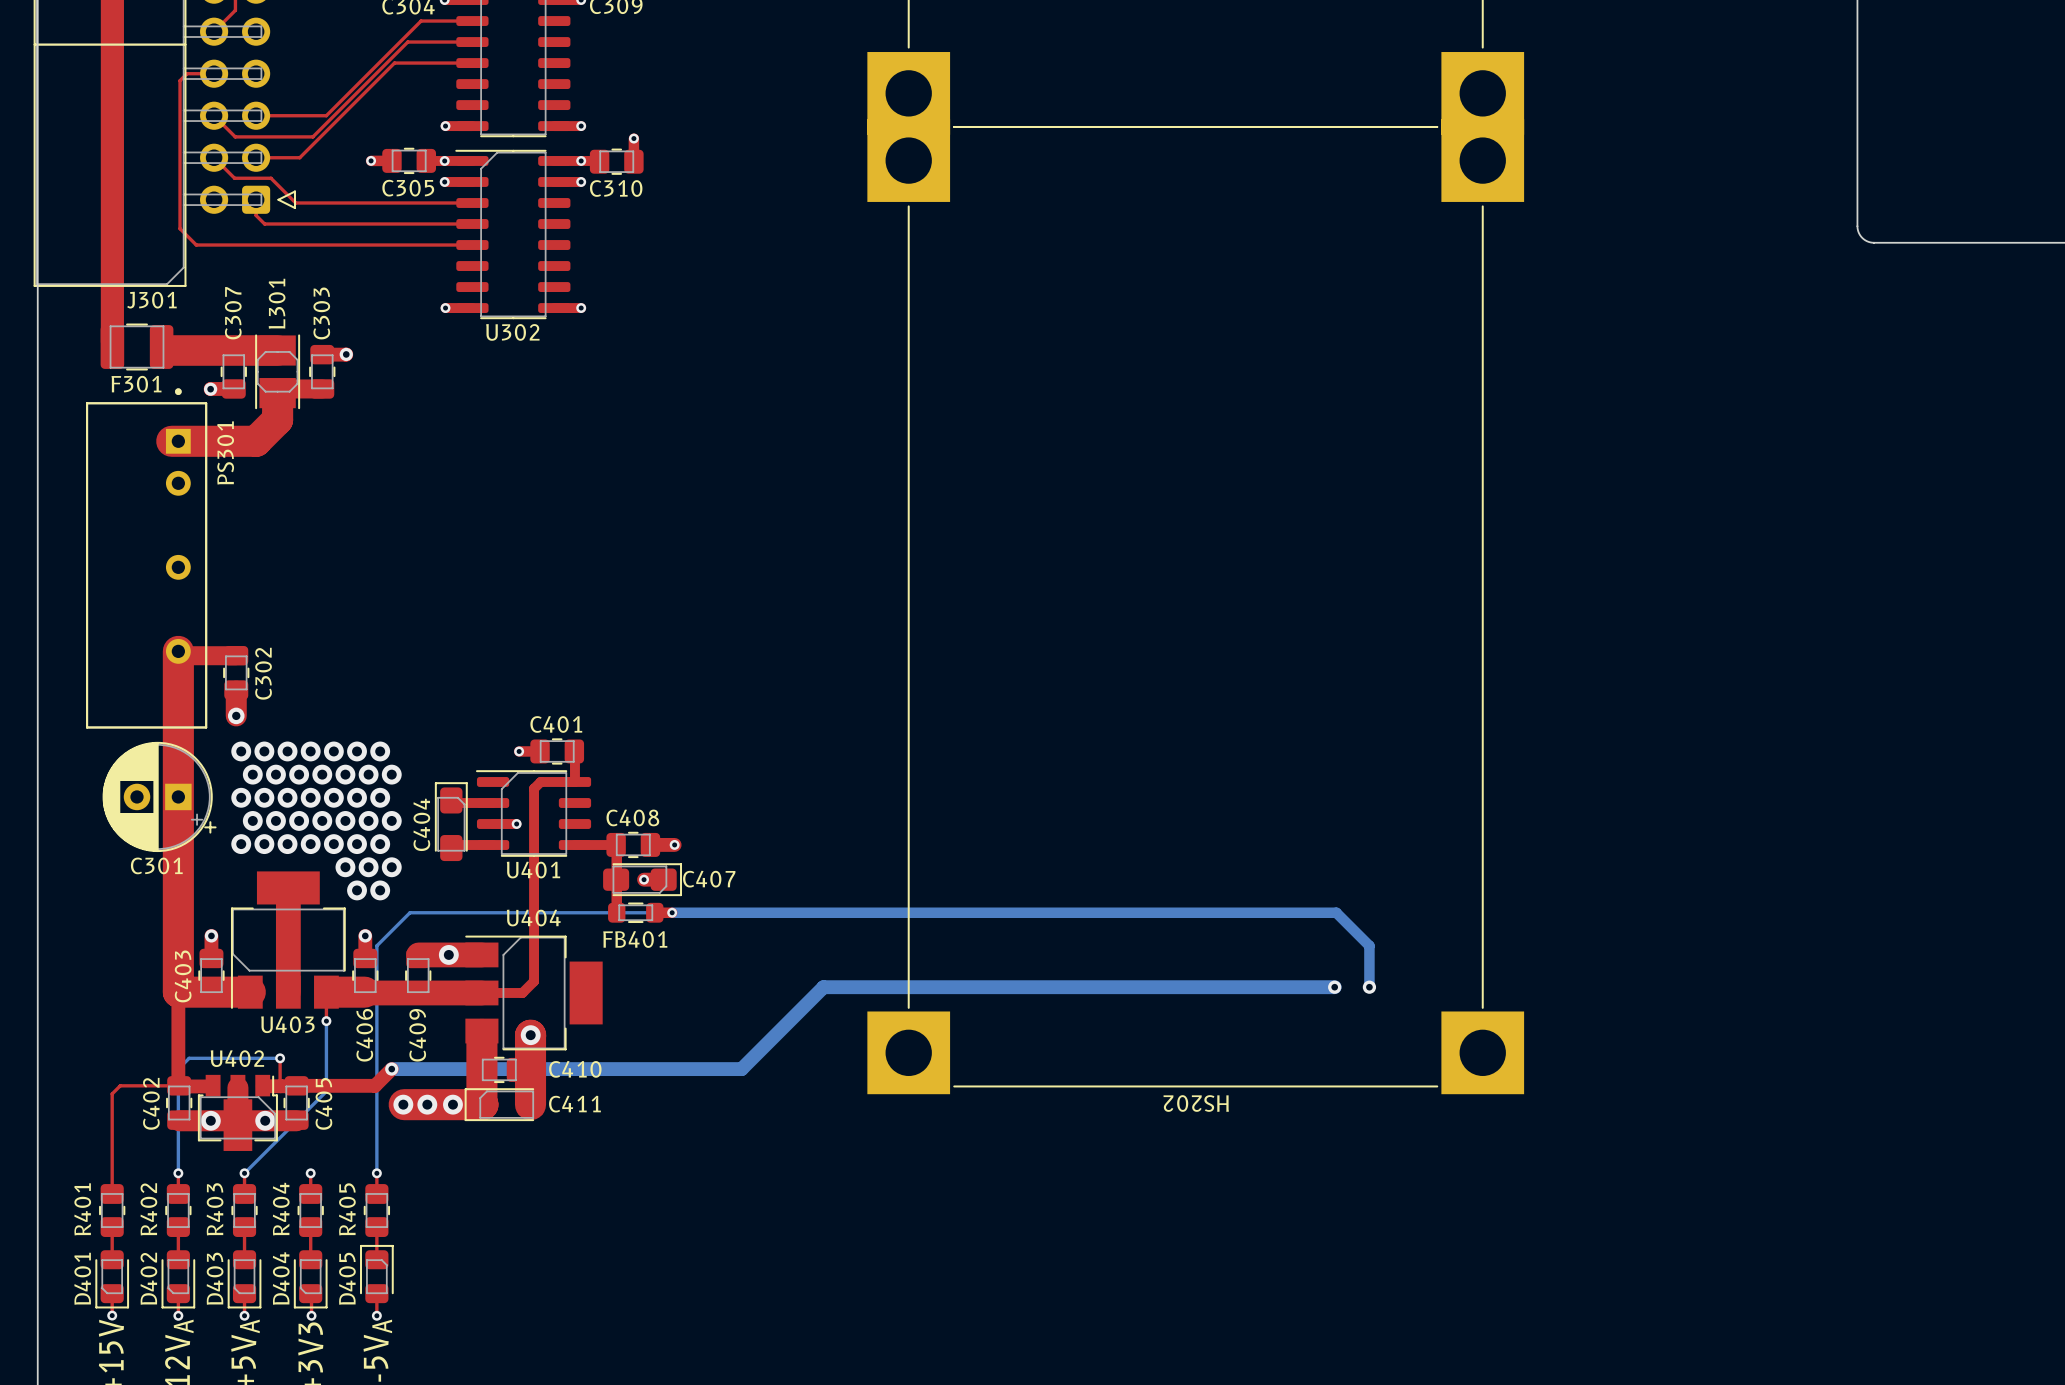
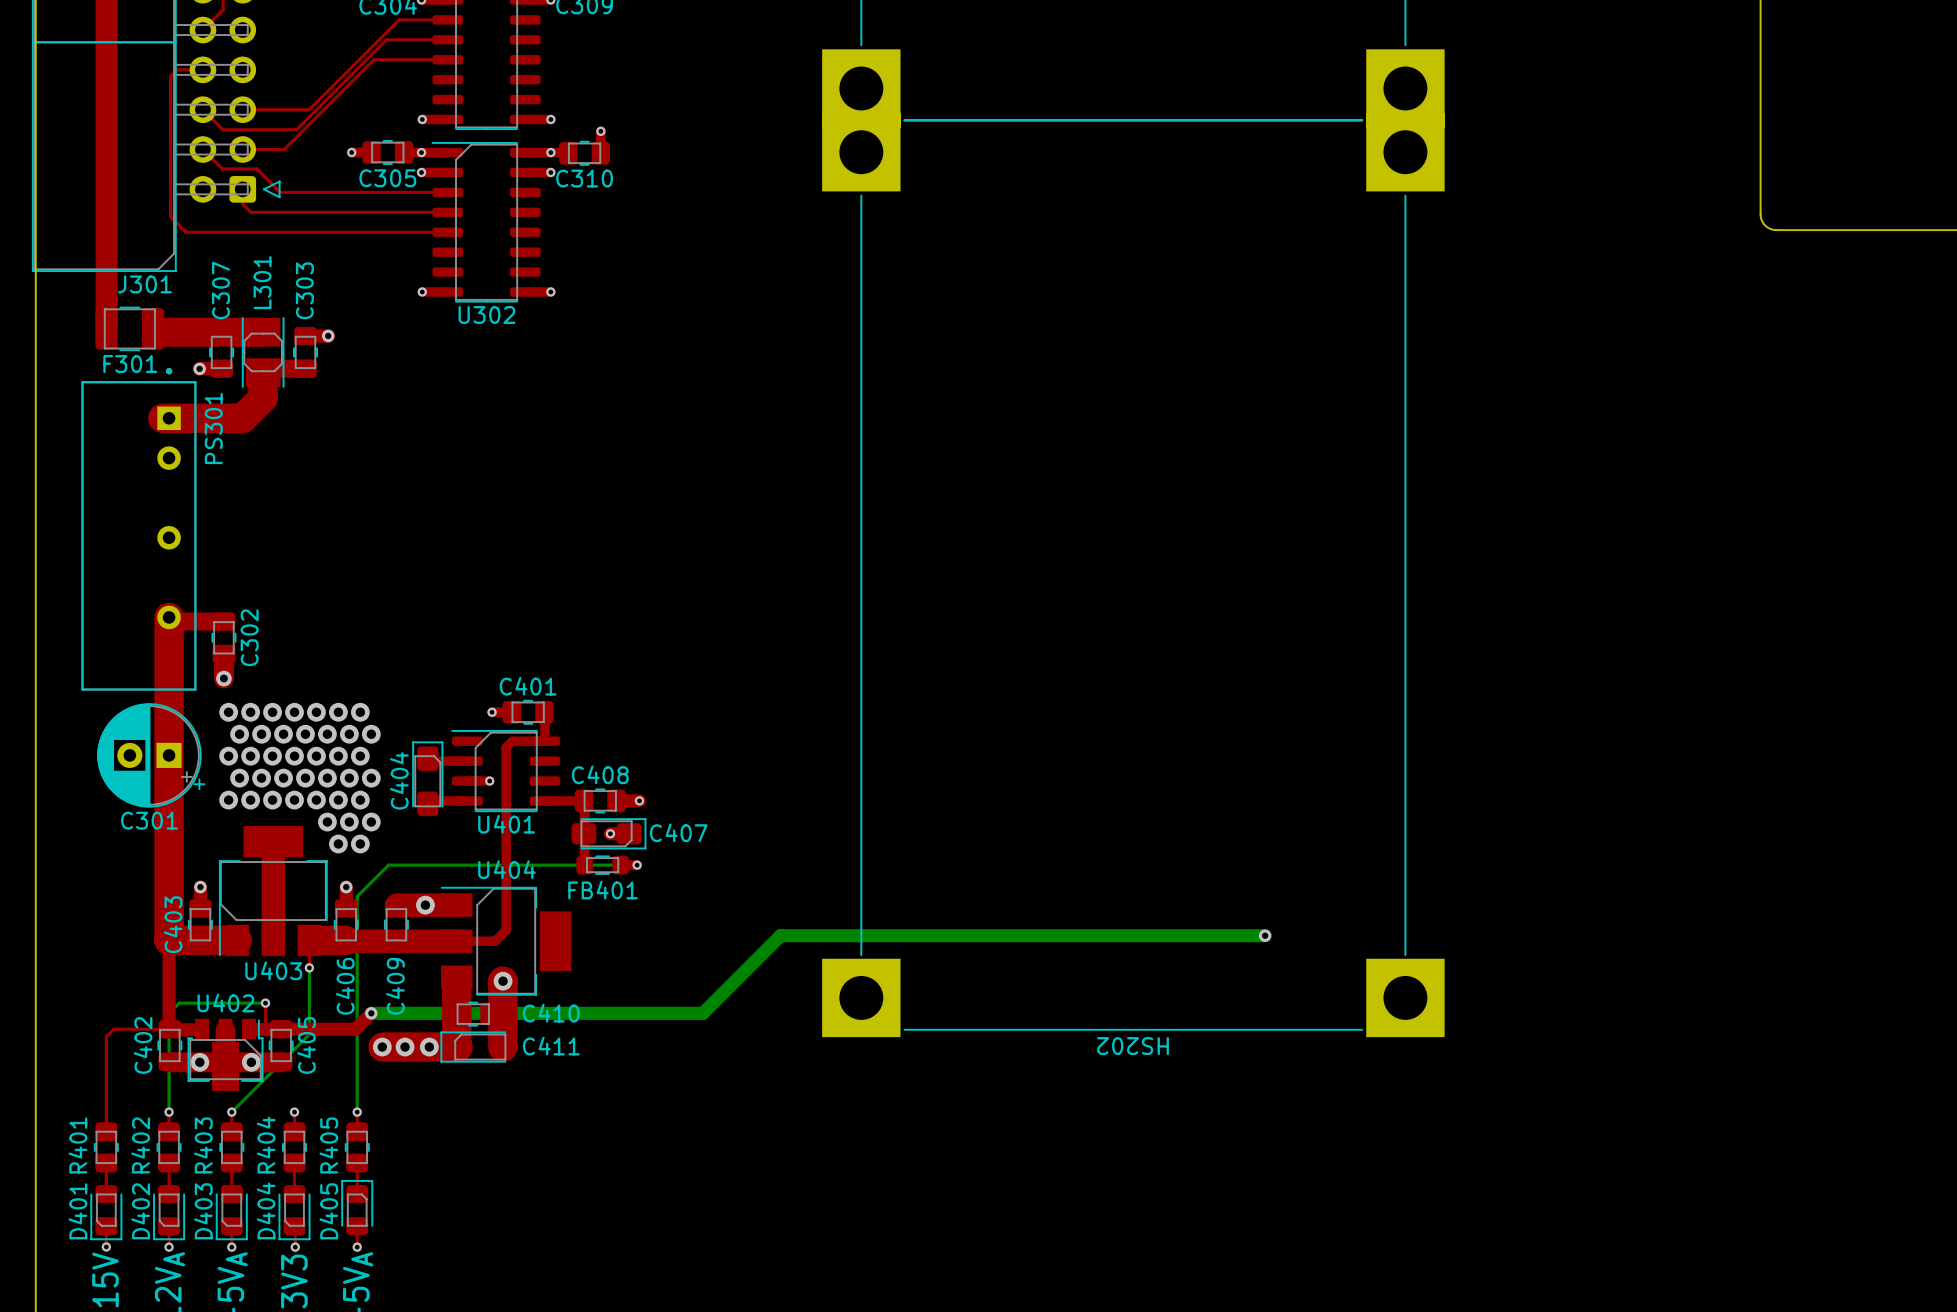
bottom track: (672, 912) (1336, 912) (1369, 945) (1369, 987) -> none
via: (1369, 987) -> none

